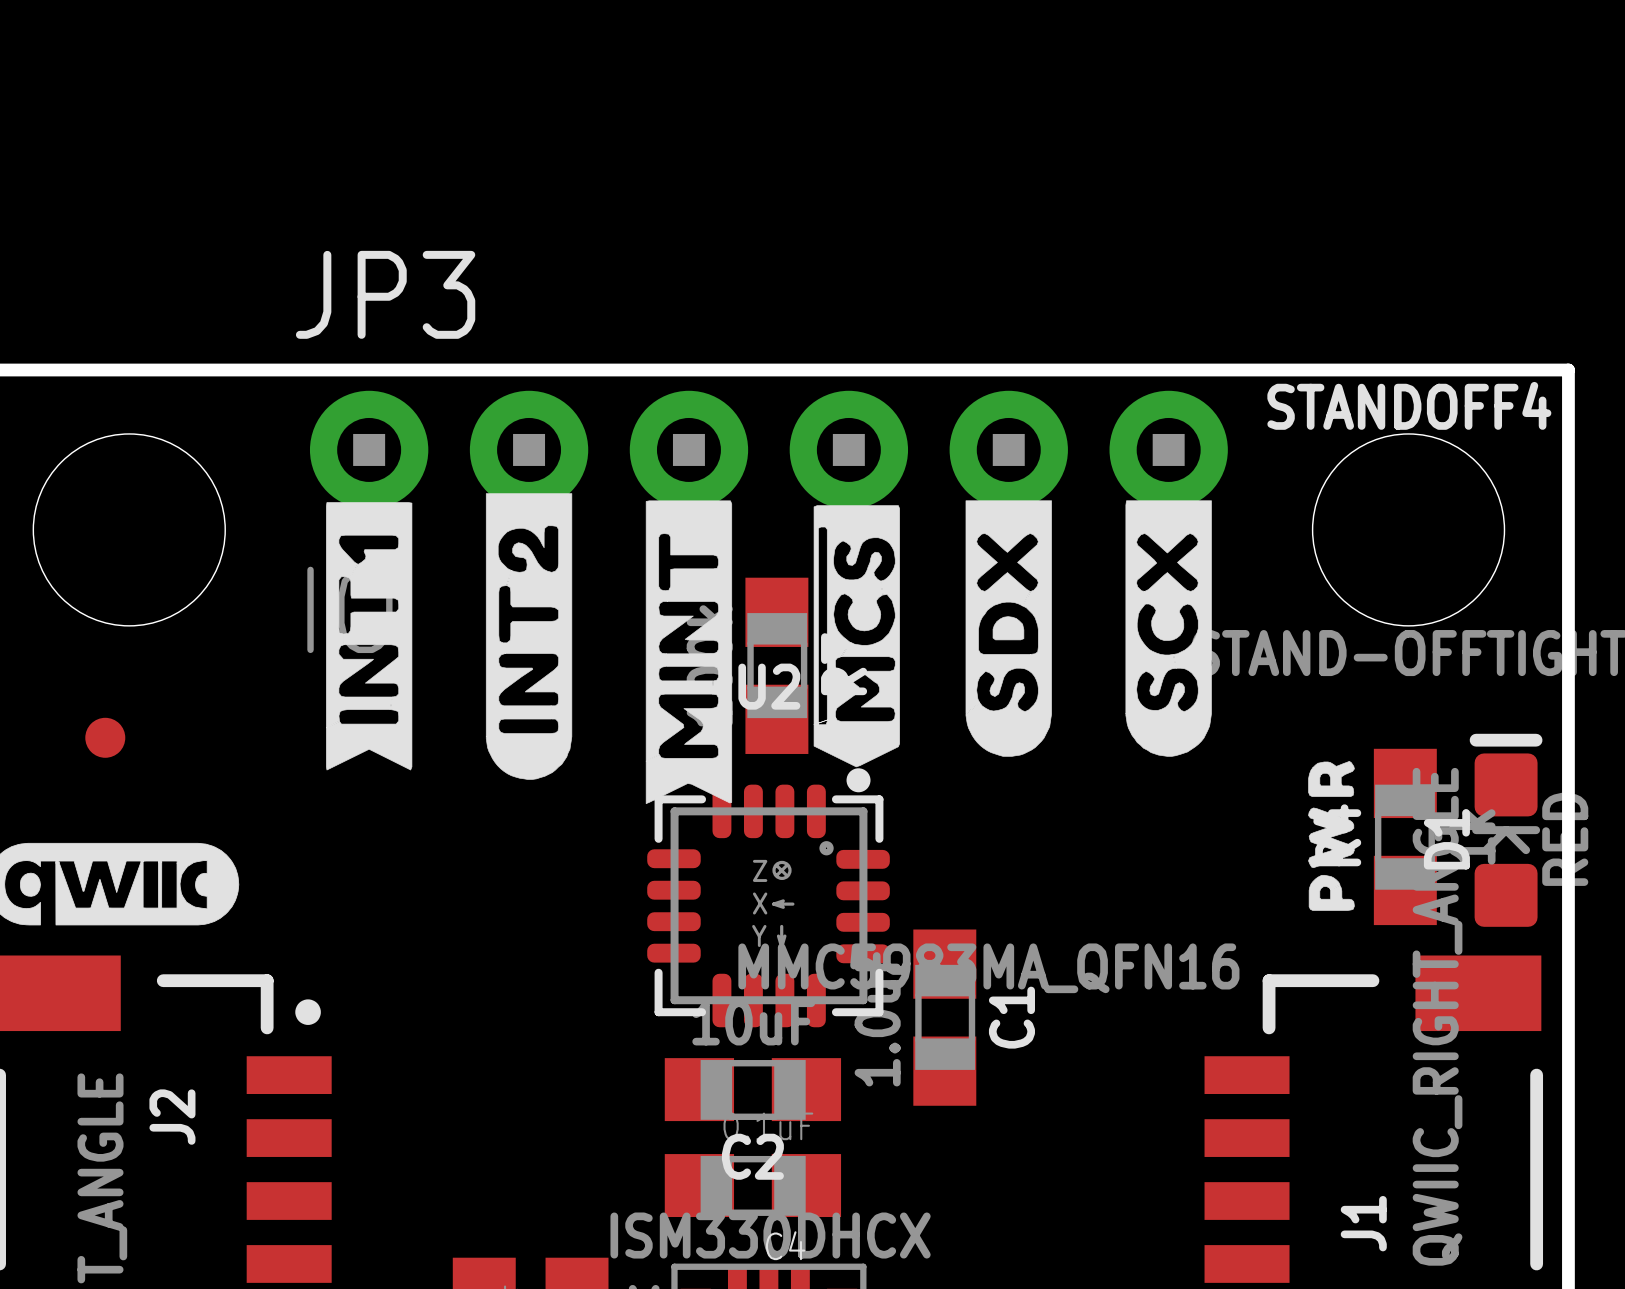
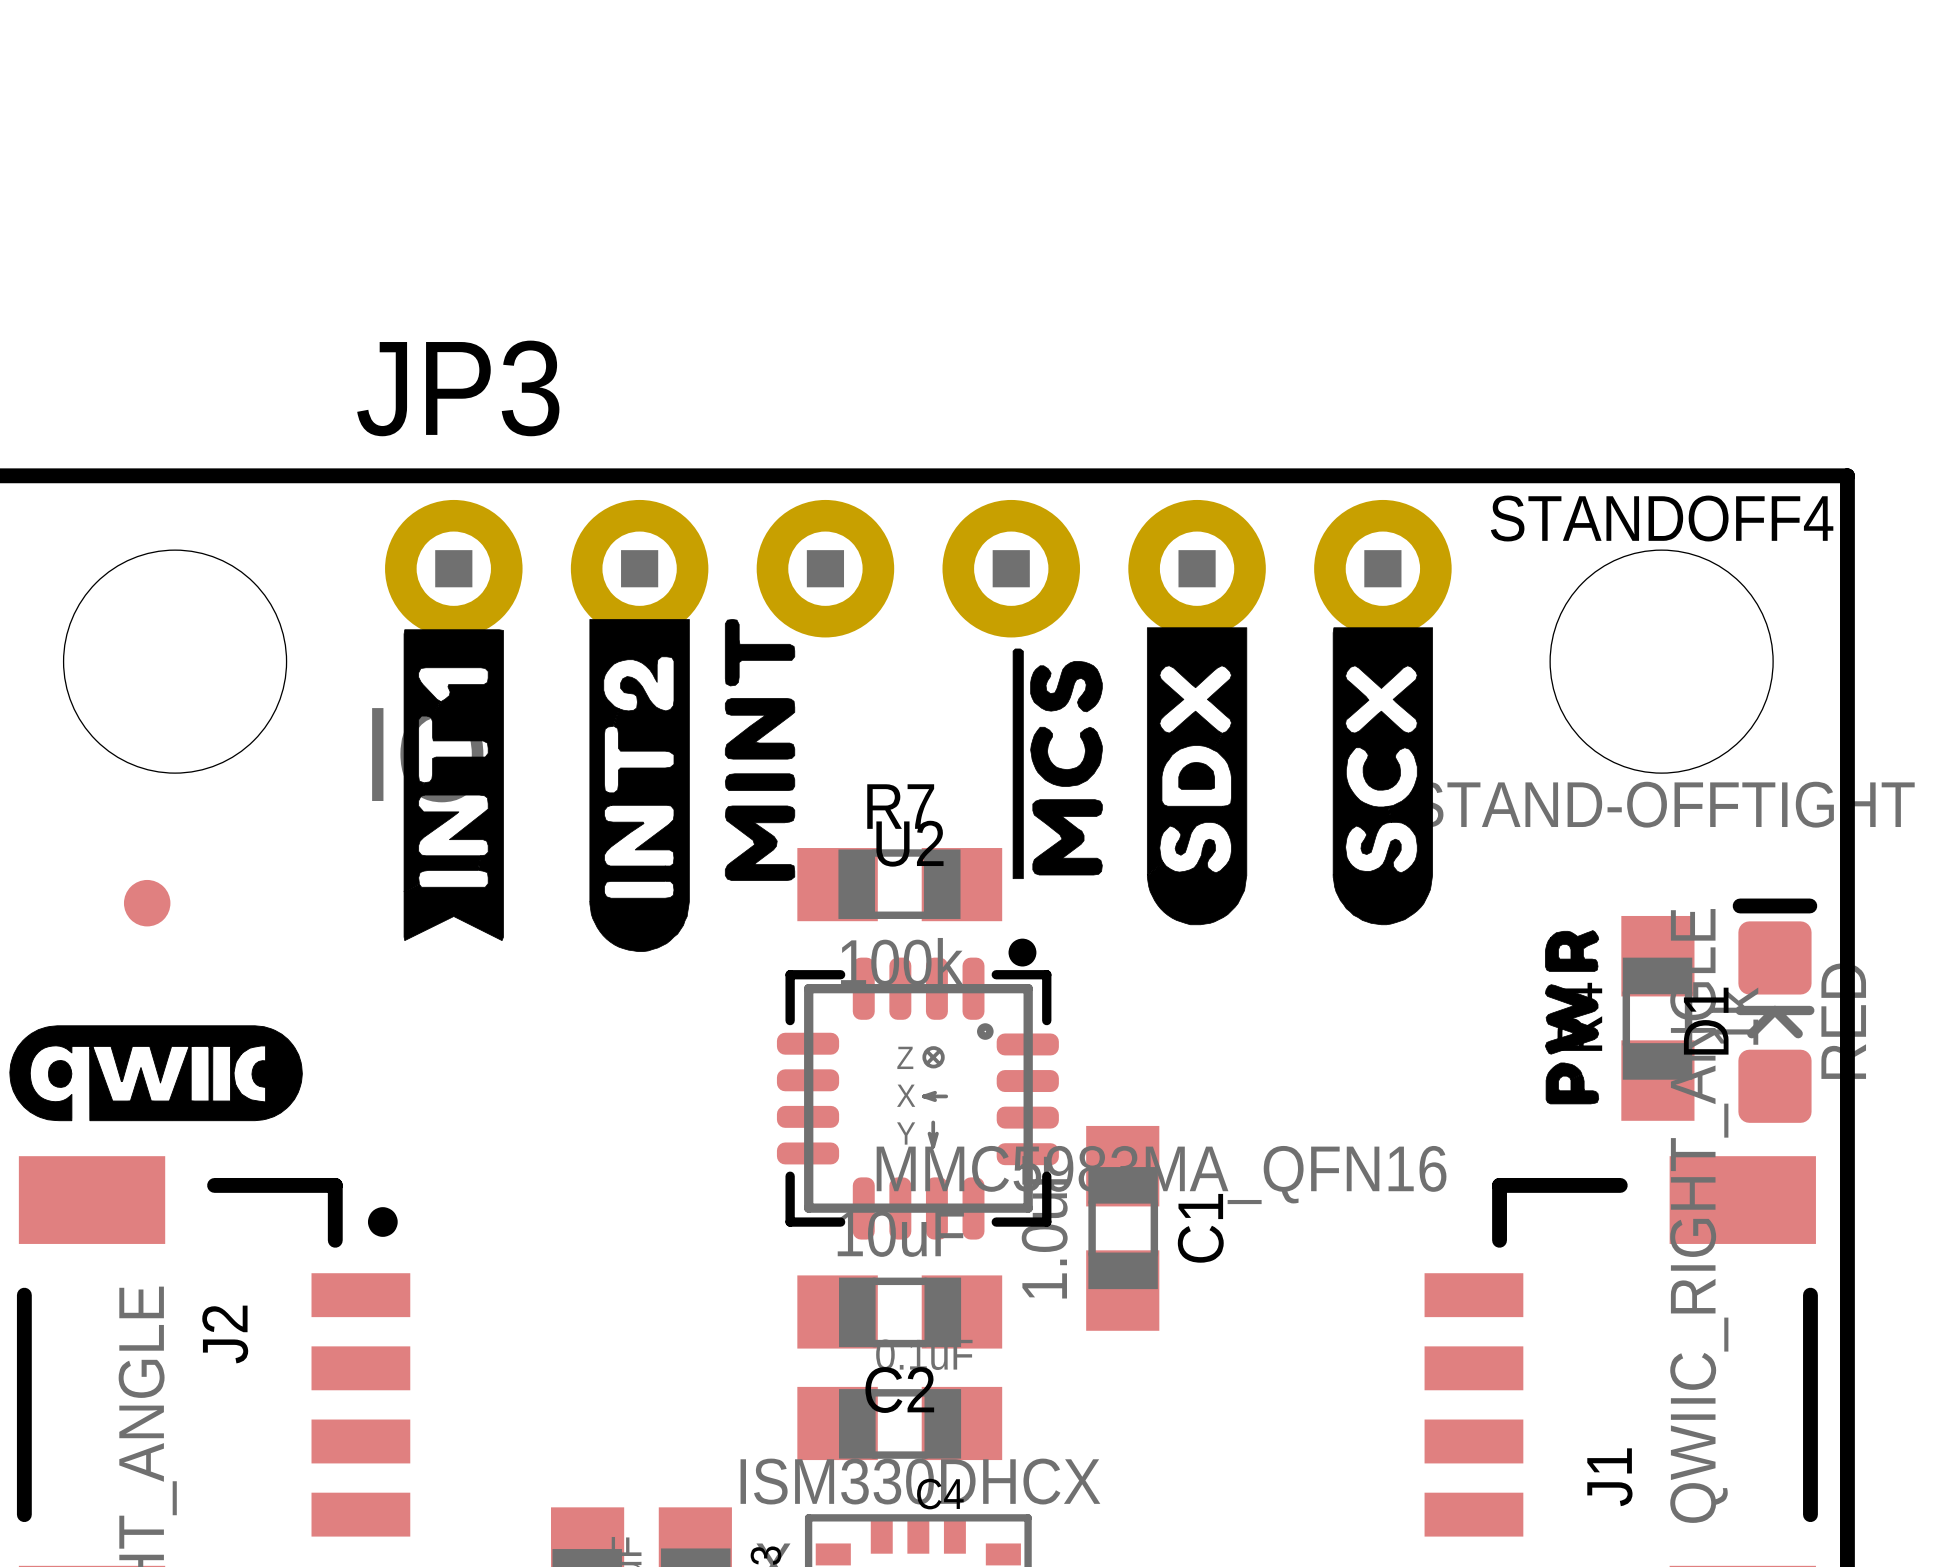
drawing: none -> [724, 619, 796, 881]
drawing: [645, 500, 733, 804] -> none
drawing shape: [813, 505, 900, 768] -> [1012, 648, 1103, 880]
R7 rotation: 0° (776, 665) -> 90° clockwise (899, 884)

